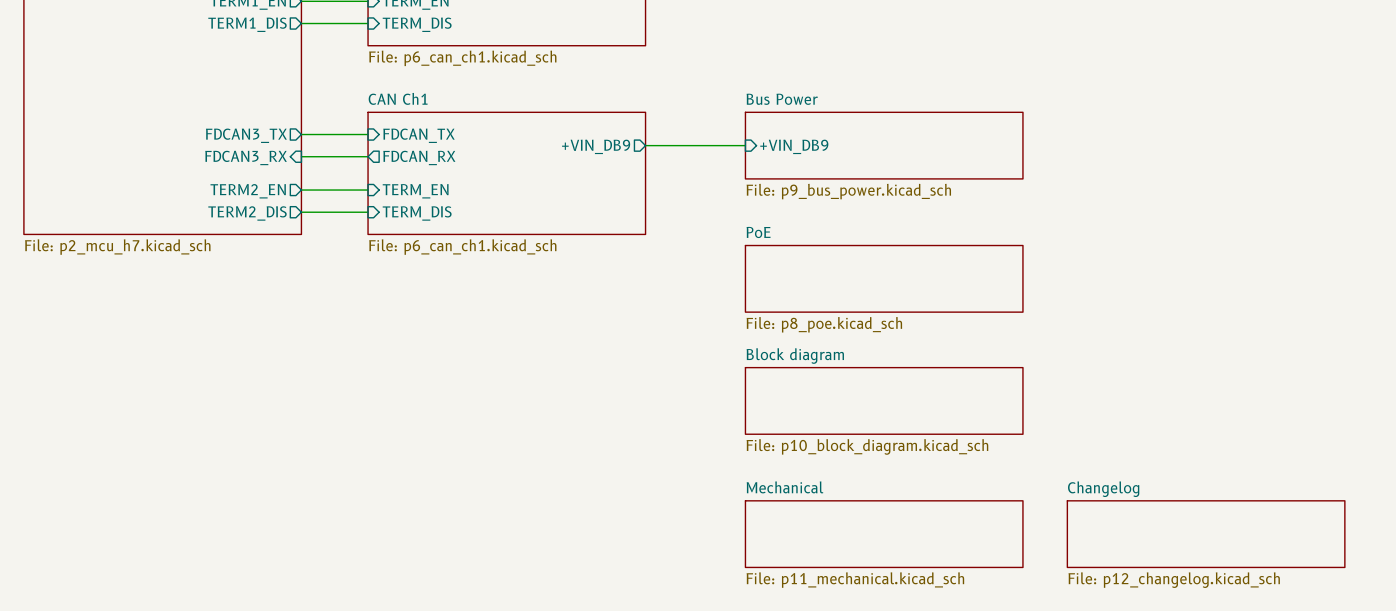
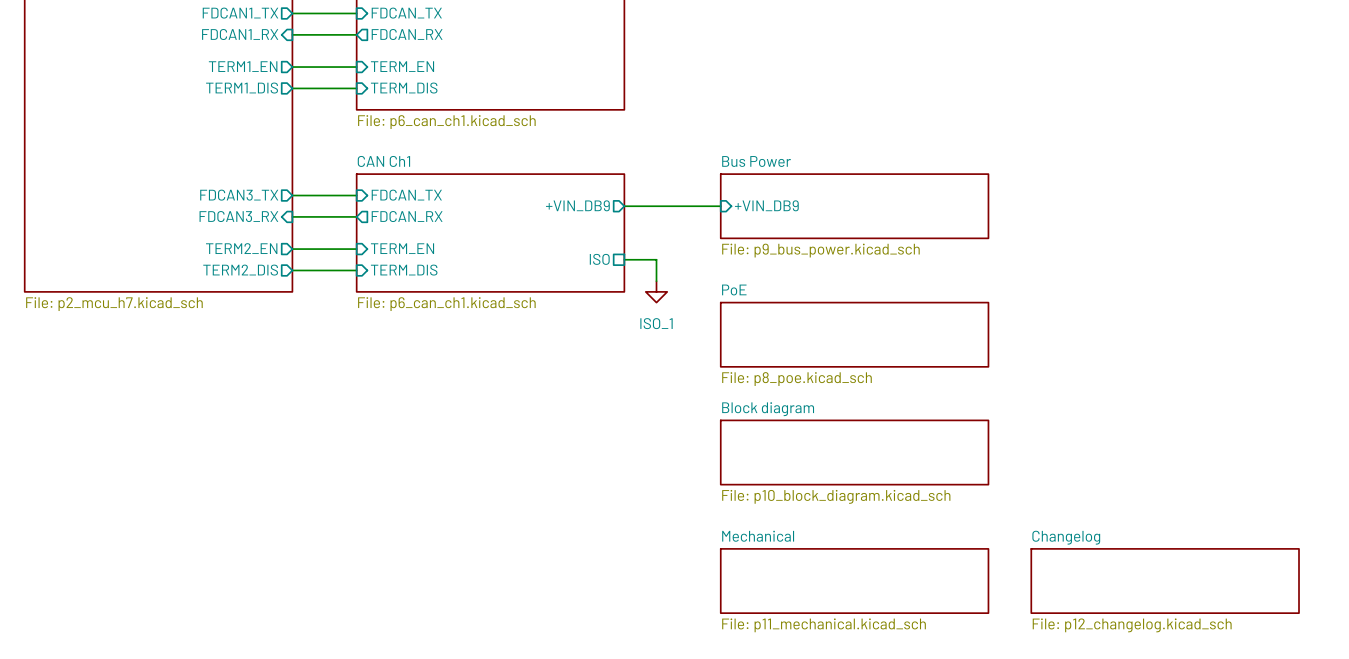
sheet pin: none -> ISO (599, 259)
wire: none -> (624, 259) (656, 259) (656, 281)
power symbol: none -> ISO_1 (656, 291)

